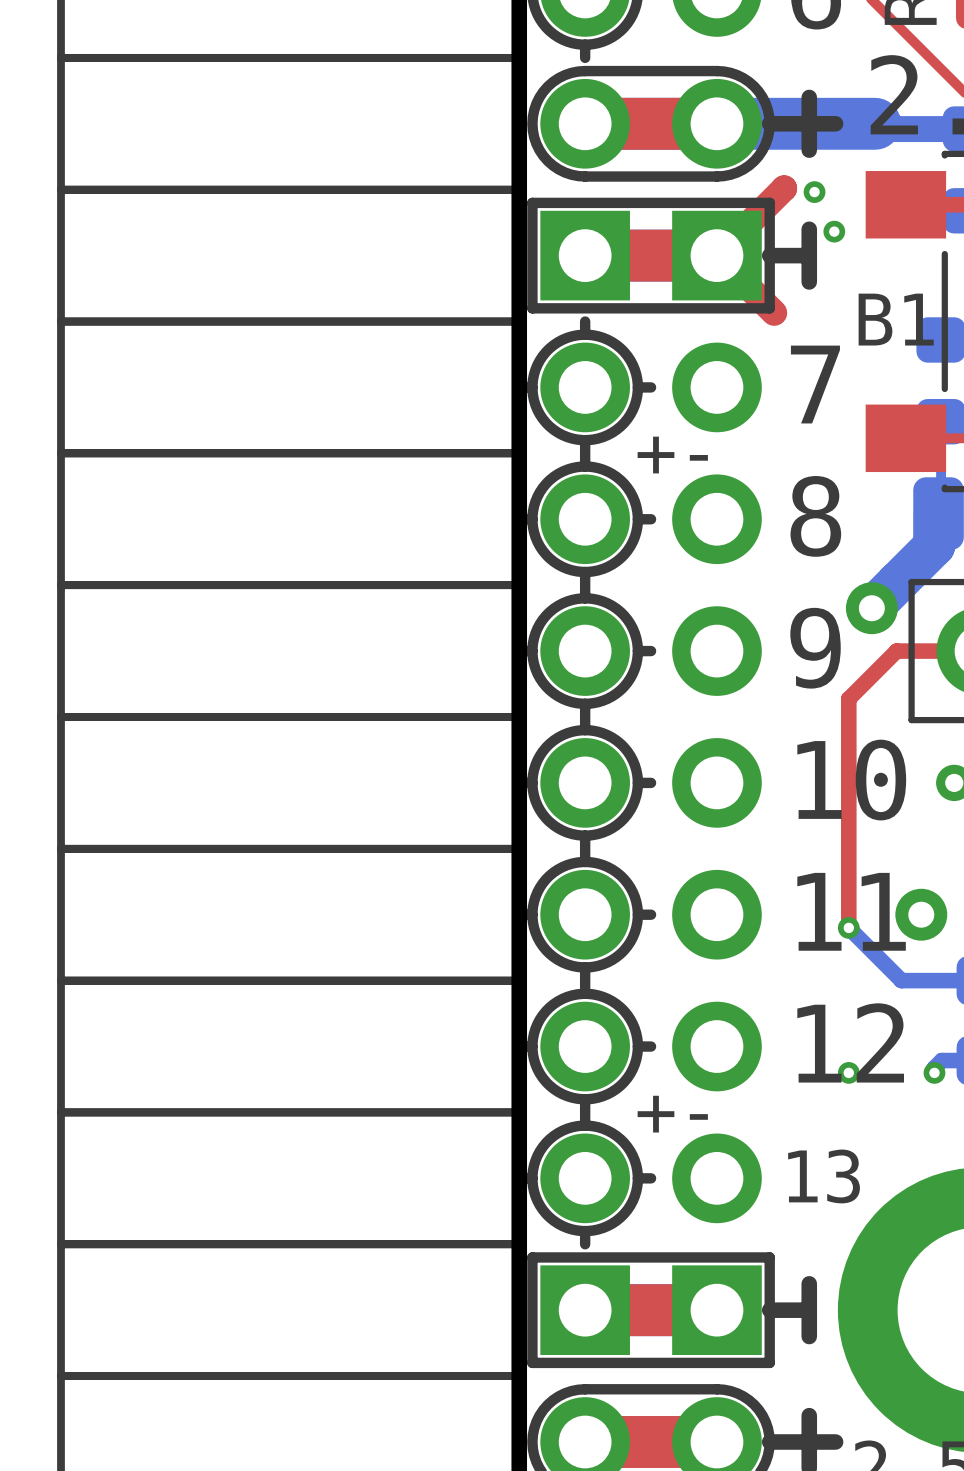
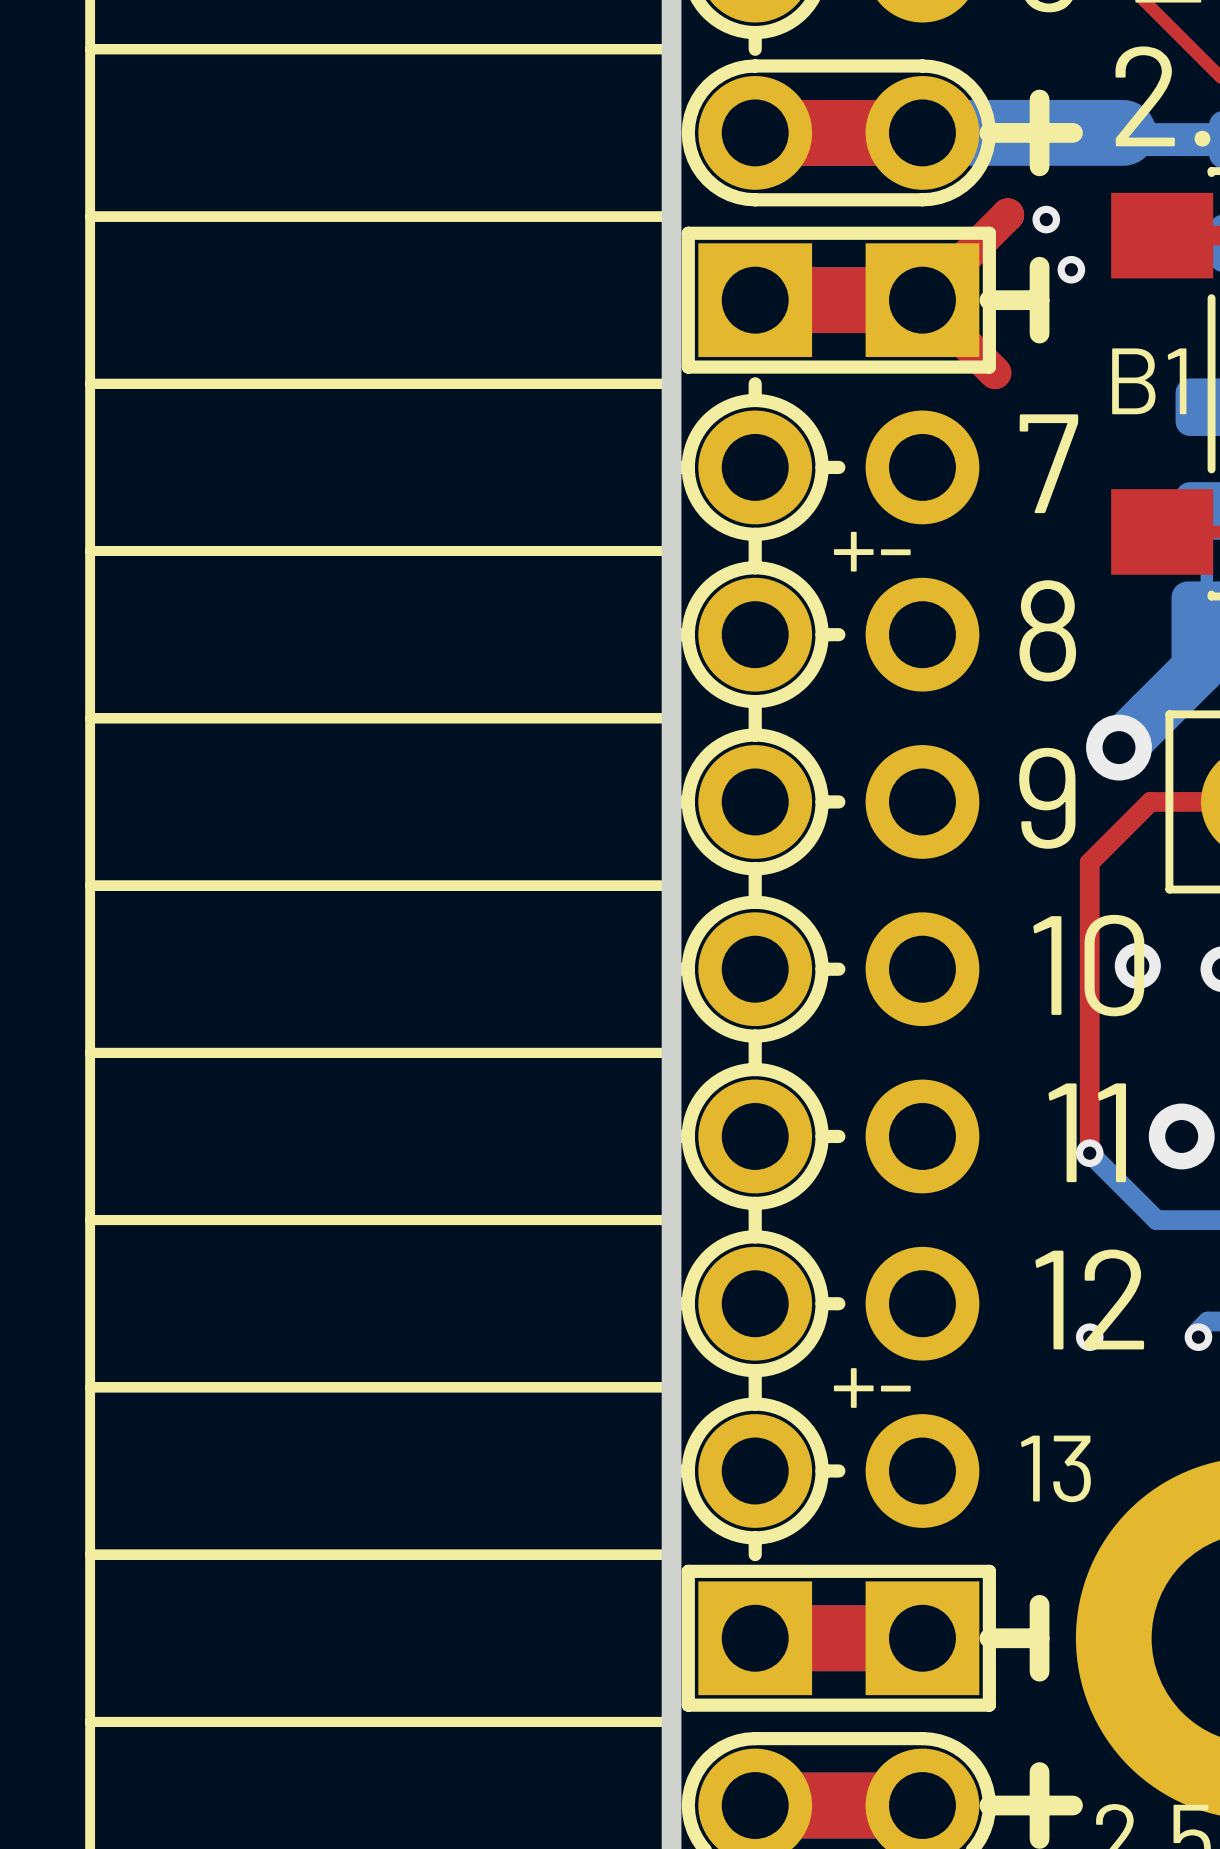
via: none -> (1137, 965)

